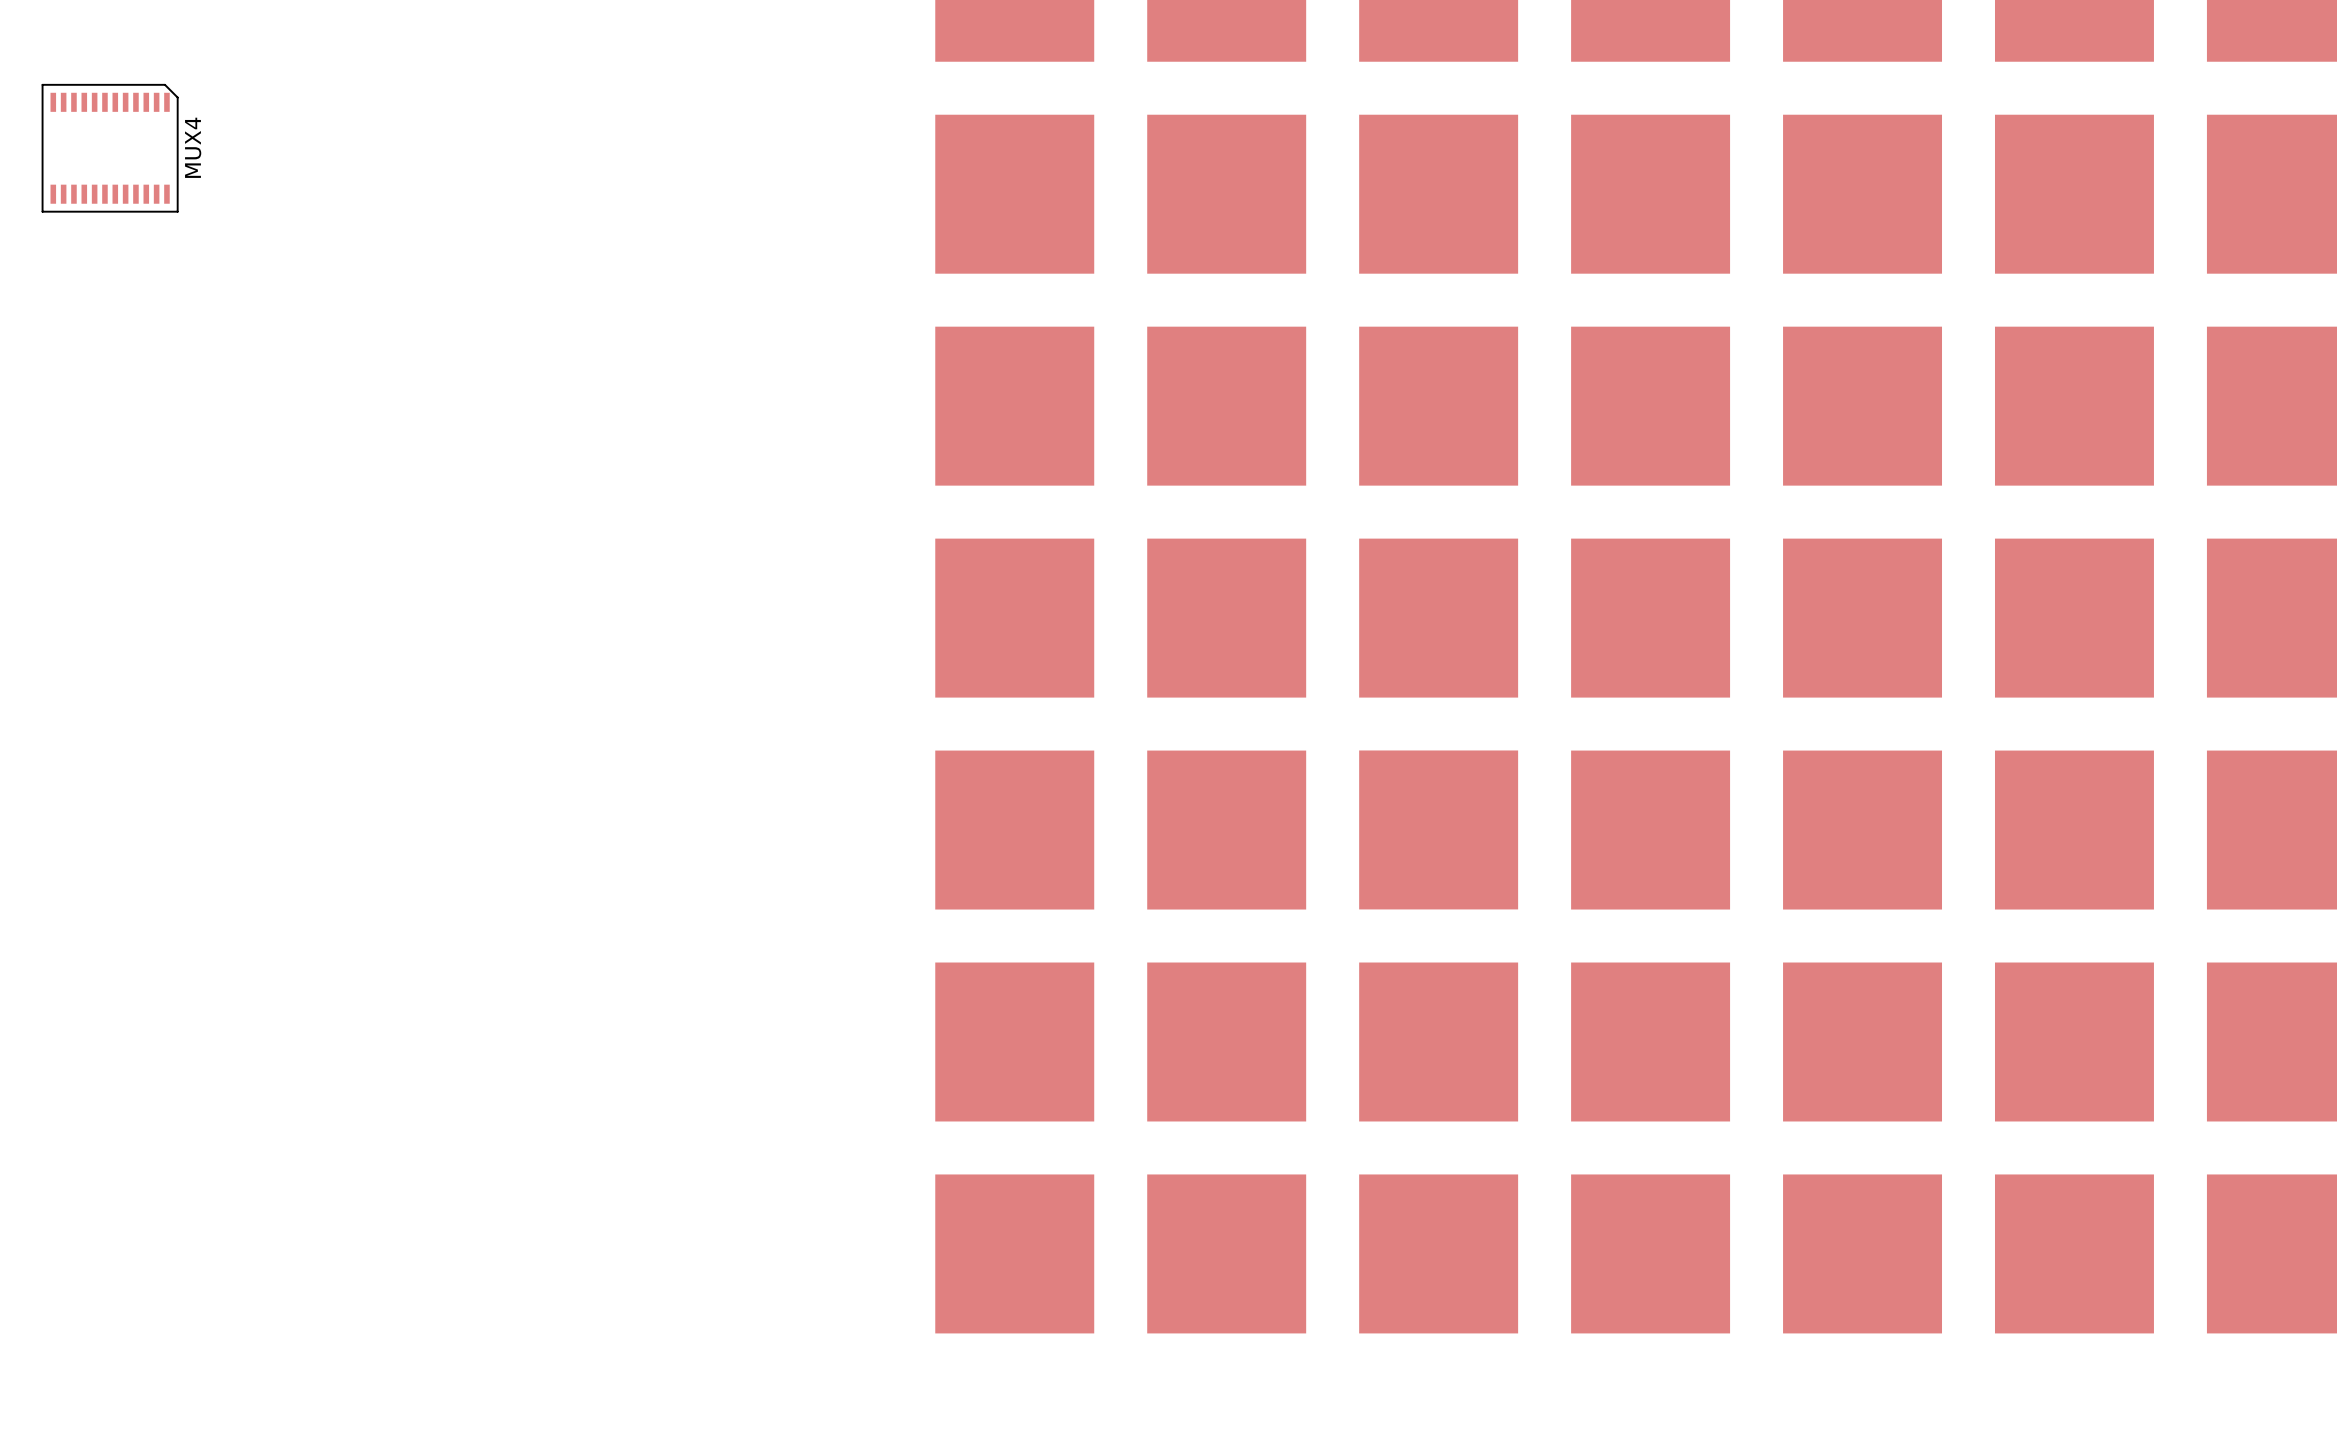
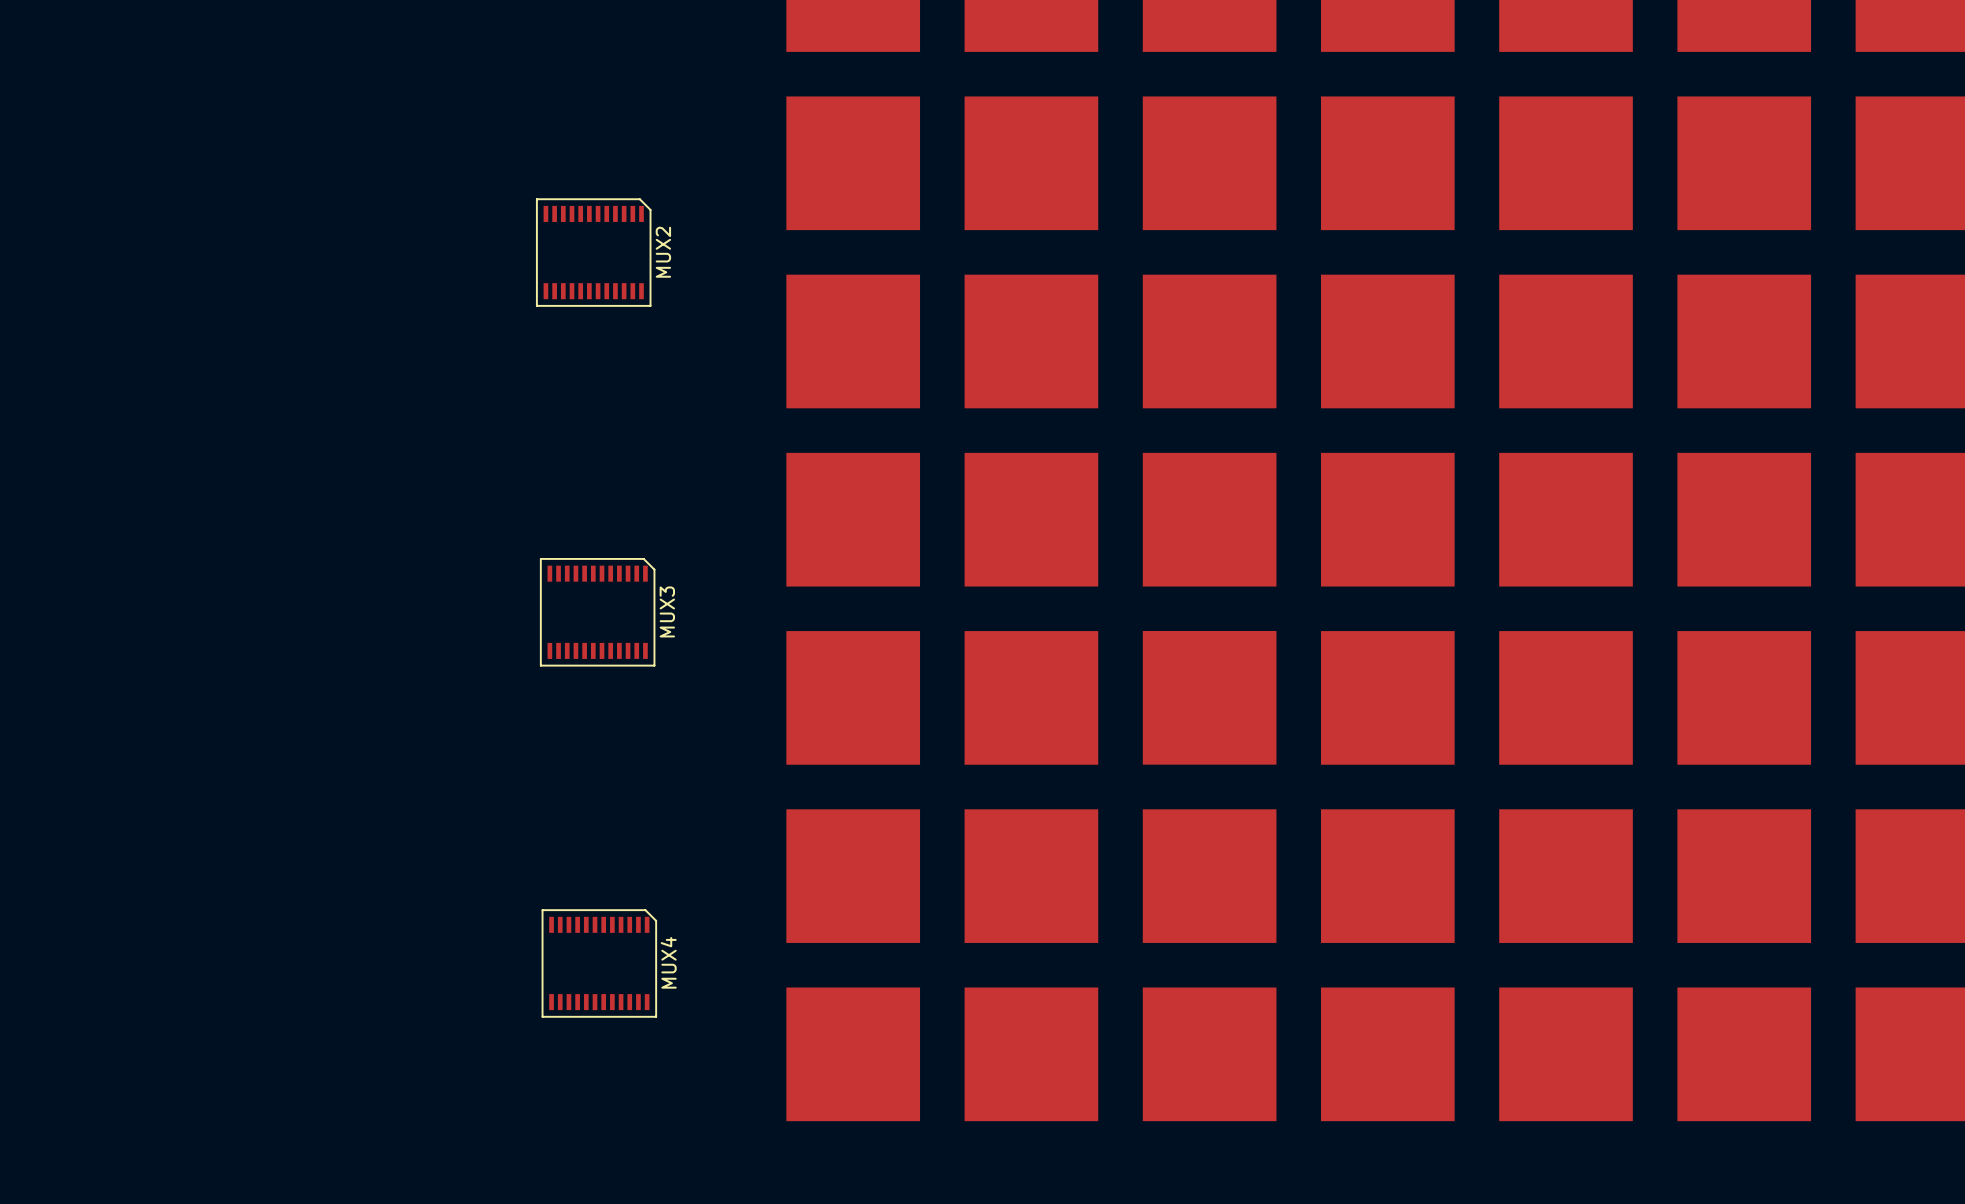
MUX4 position: (110, 148) -> (599, 963)
MUX2: none -> (593, 252)
MUX3: none -> (597, 612)

